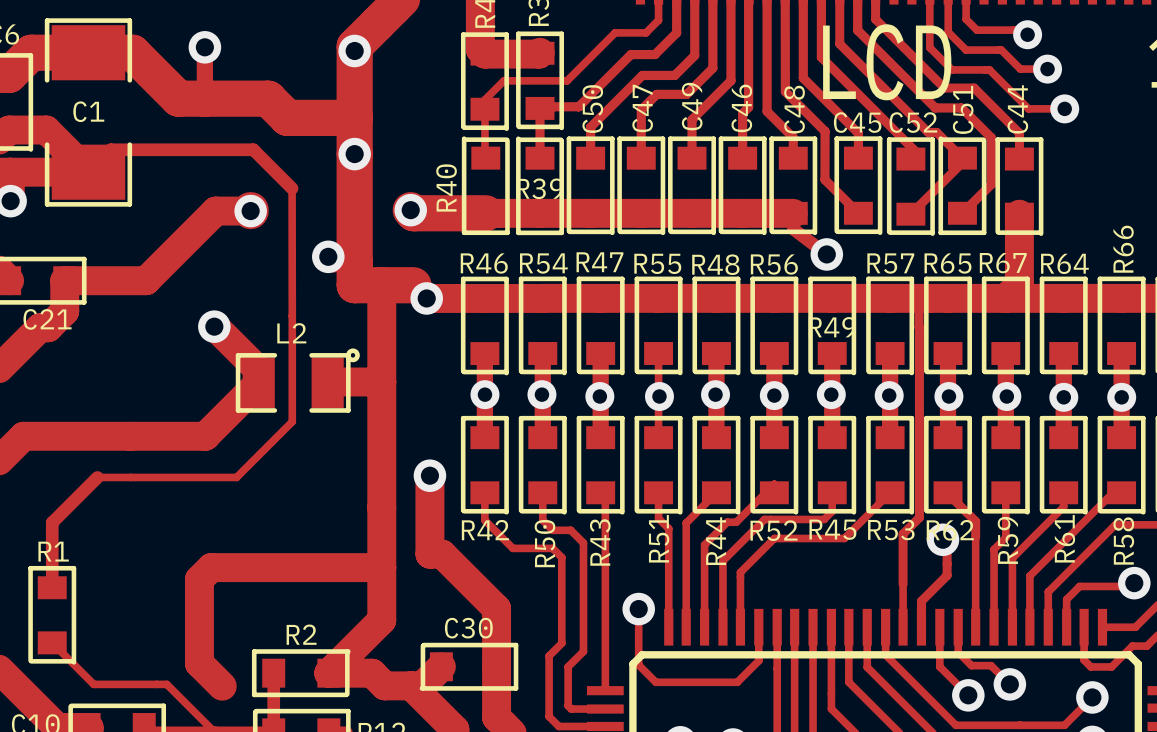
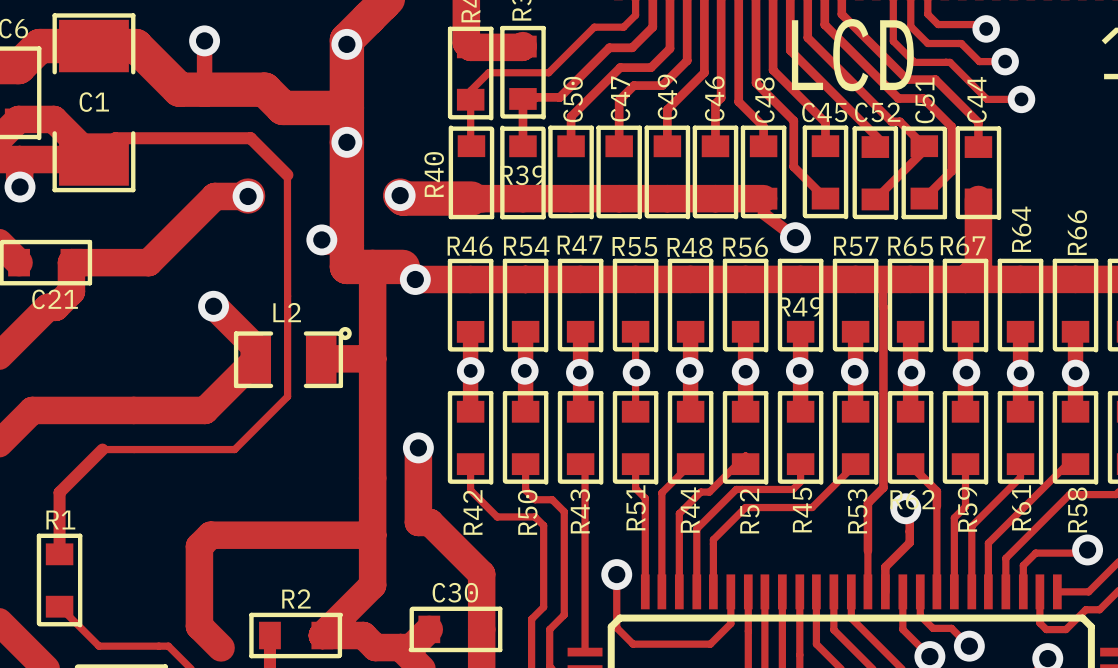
R64 name rotation: 0° (1064, 263) -> 90° counterclockwise (1021, 229)
R45 name rotation: 0° (832, 529) -> 90° counterclockwise (802, 510)
R53 name rotation: 0° (891, 529) -> 90° counterclockwise (857, 511)
R42 name rotation: 0° (485, 530) -> 90° counterclockwise (472, 512)
R52 name rotation: 0° (773, 530) -> 90° counterclockwise (749, 511)

